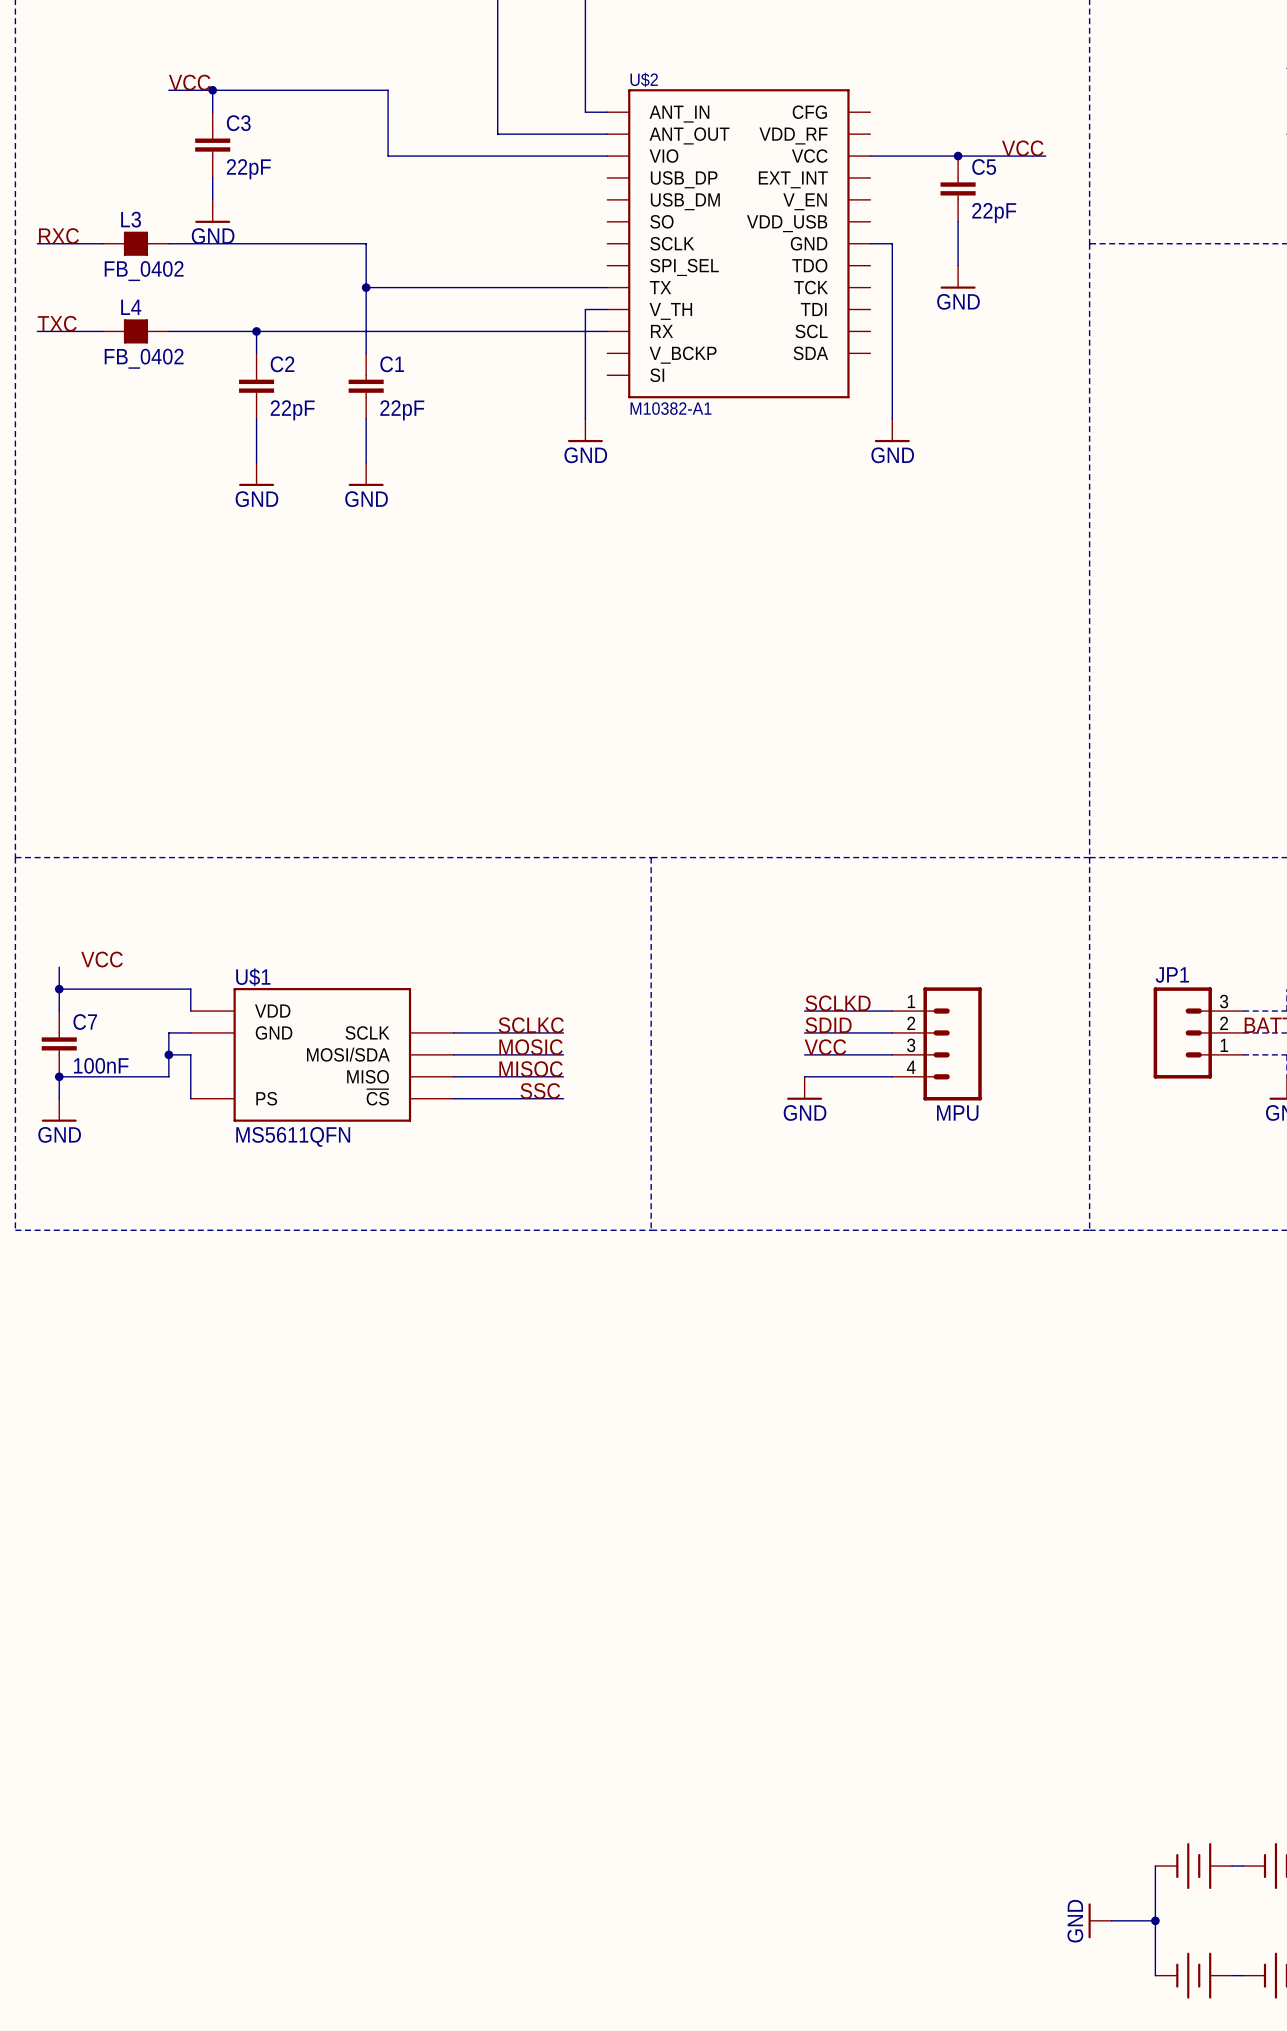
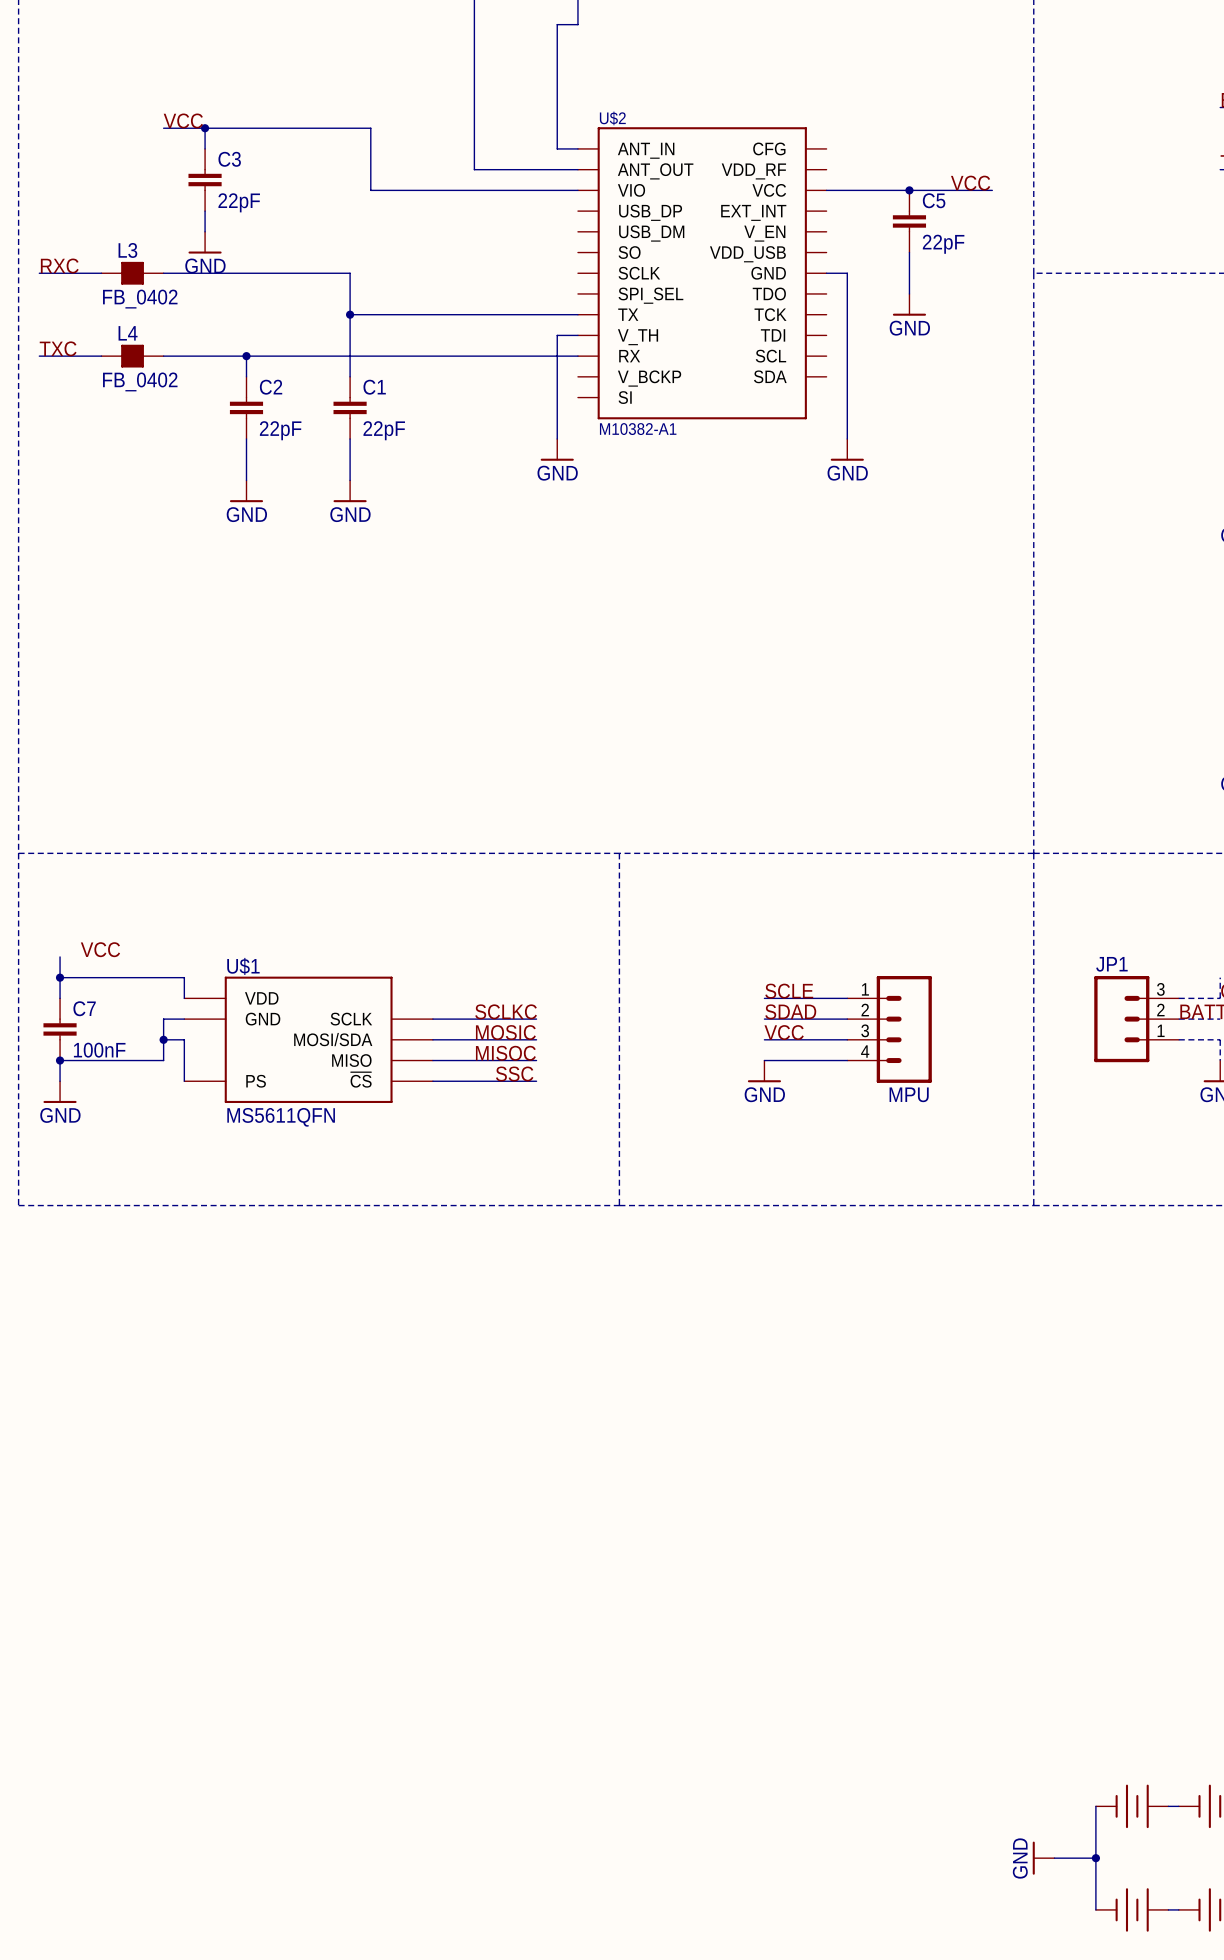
label: SCLKD (838, 1003) -> SCLE (789, 991)
label: SDID (828, 1025) -> SDAD (790, 1011)

